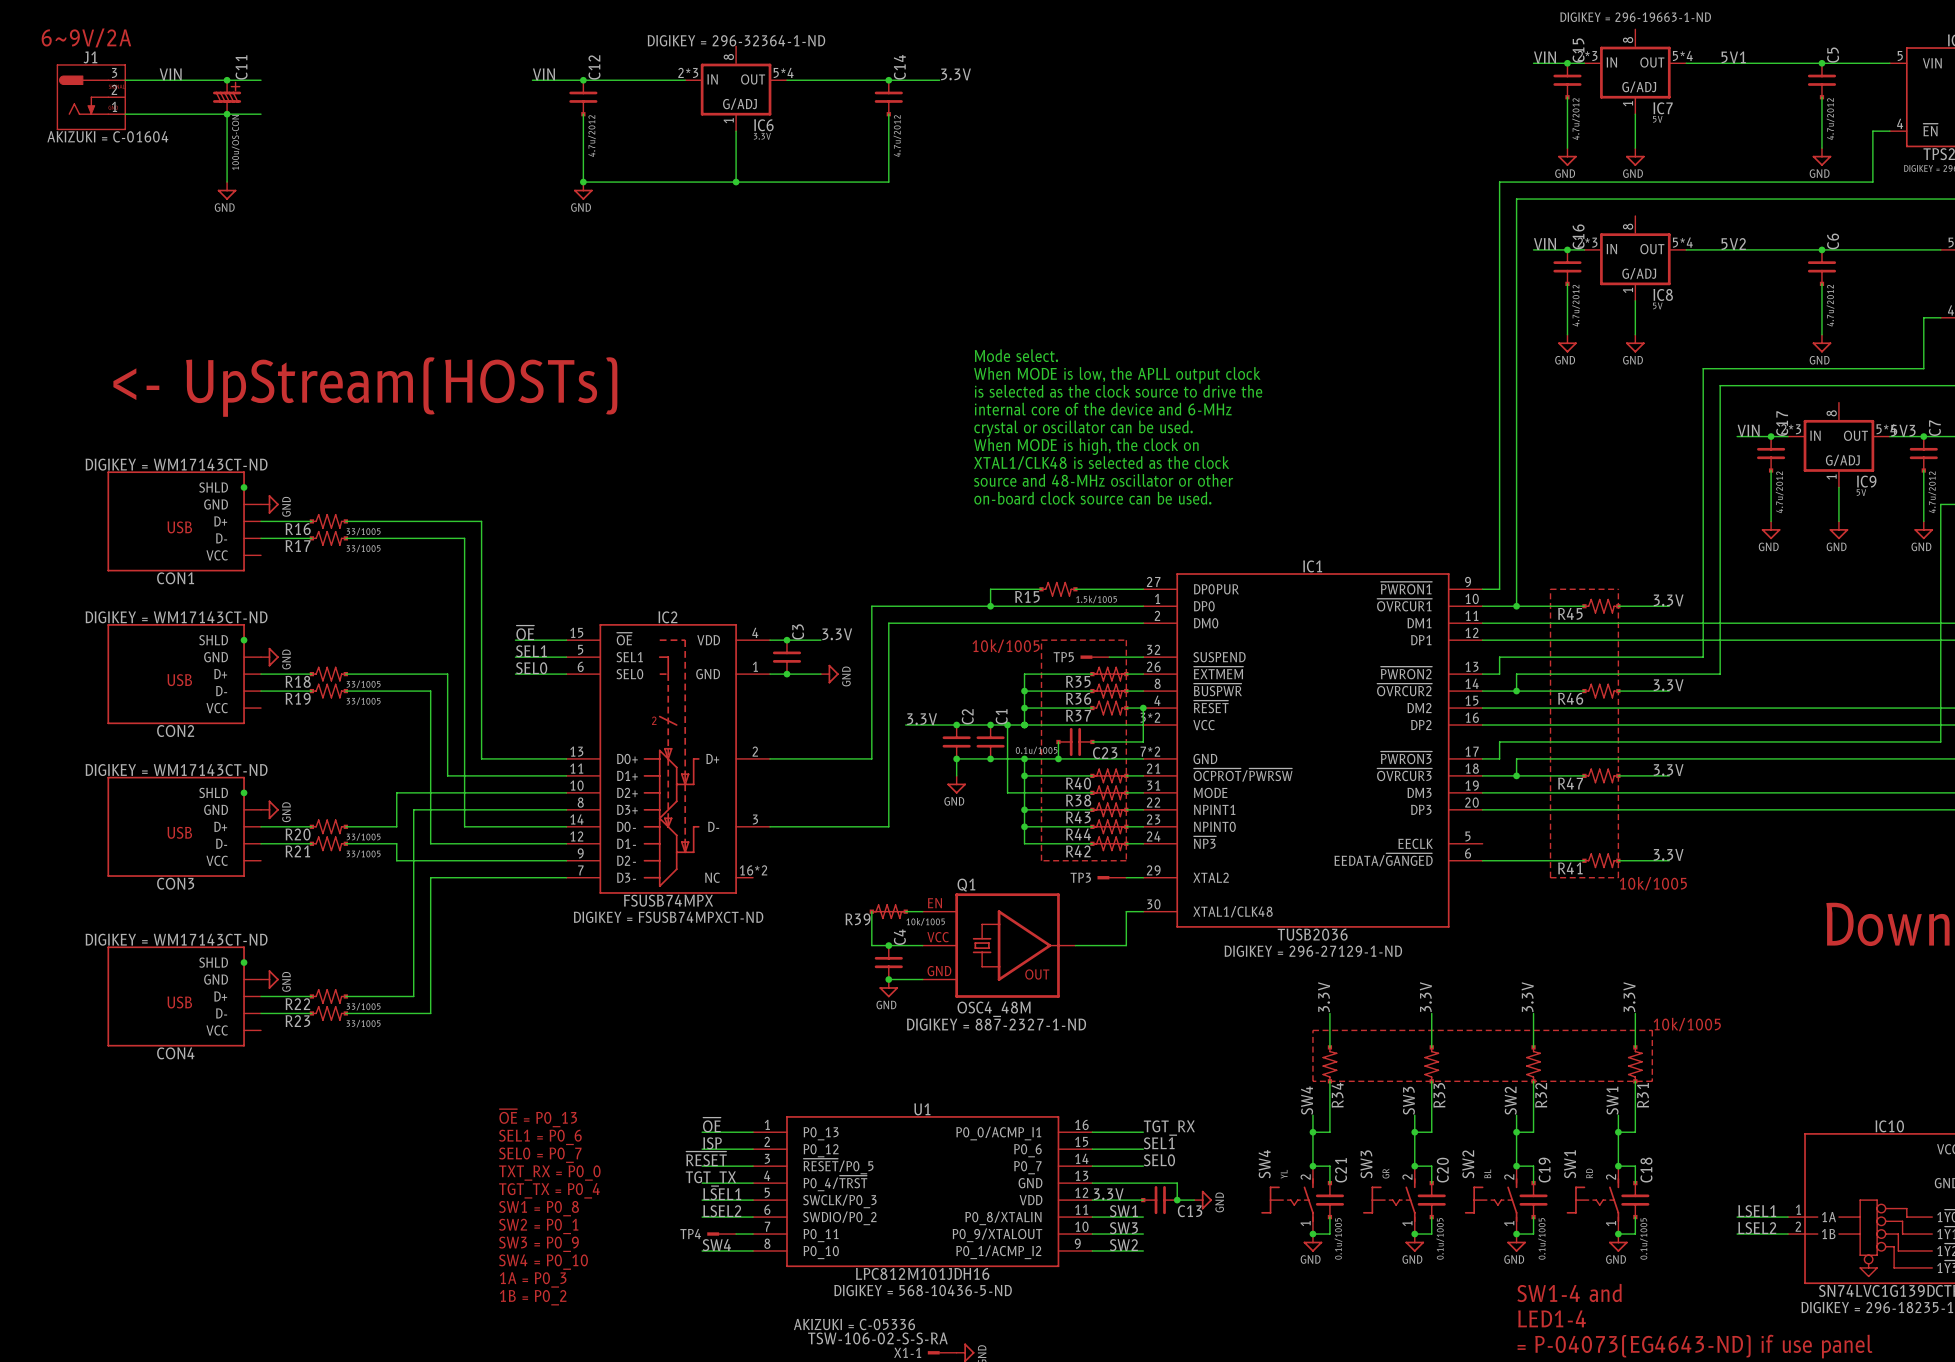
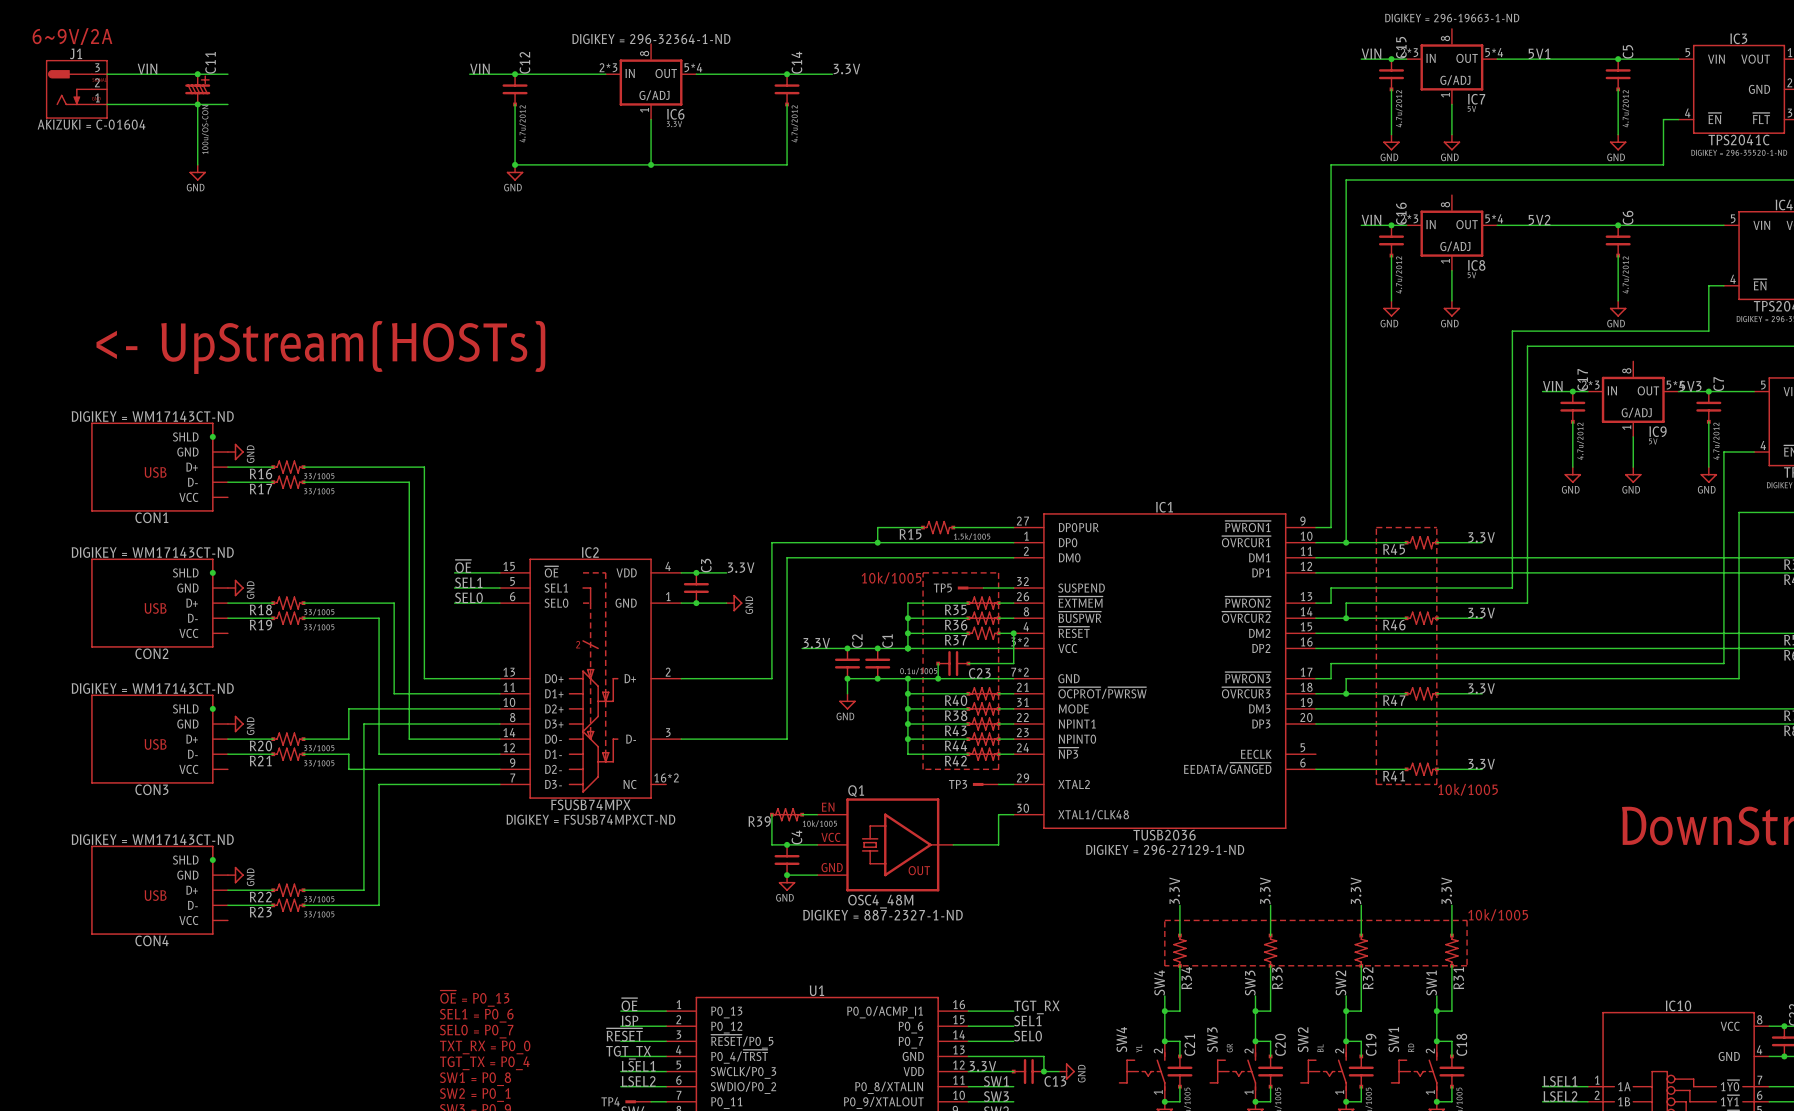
text: Mode select. (1016, 355) -> none
text: When MODE is low, the APLL output clock (1117, 375) -> none
text: is selected as the clock source to drive the (1118, 391) -> none
text: internal core of the device and 6-MHz (1103, 409) -> none
text: crystal or oscillator can be used. (1083, 428) -> none
text: When MODE is high, the clock on (1086, 446) -> none
text: XTAL1/CLK48 is selected as the clock (1101, 462) -> none
text: source and 48-MHz oscillator or other (1103, 480) -> none
text: on-board clock source can be used. (1092, 498) -> none
wire: (1007, 725) (1007, 792) (1024, 792) -> none
junction: (1007, 725) -> none
junction: none -> (907, 708)

